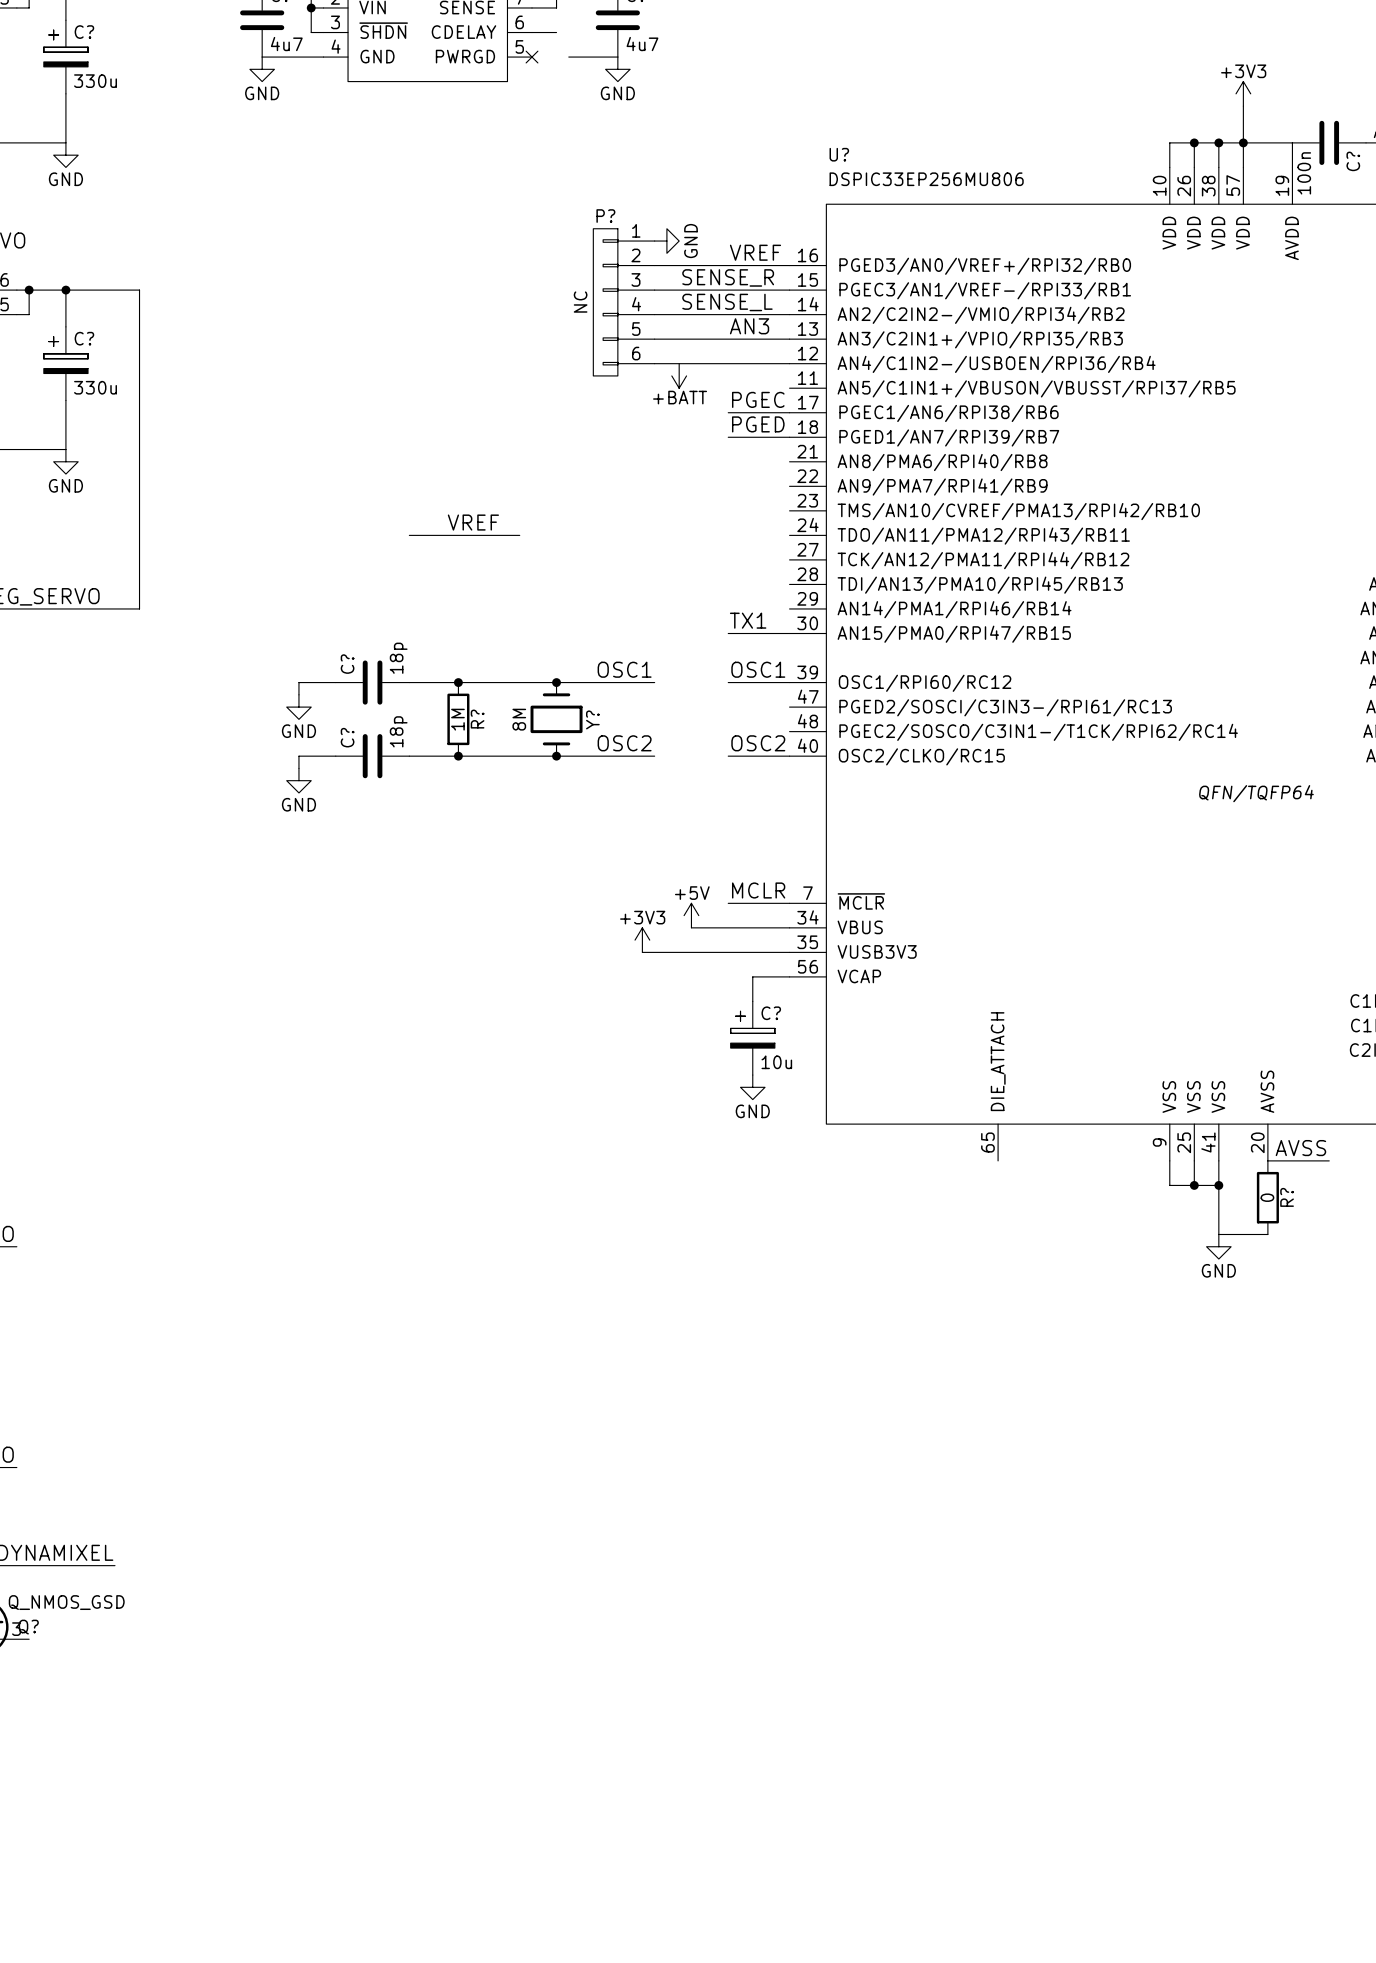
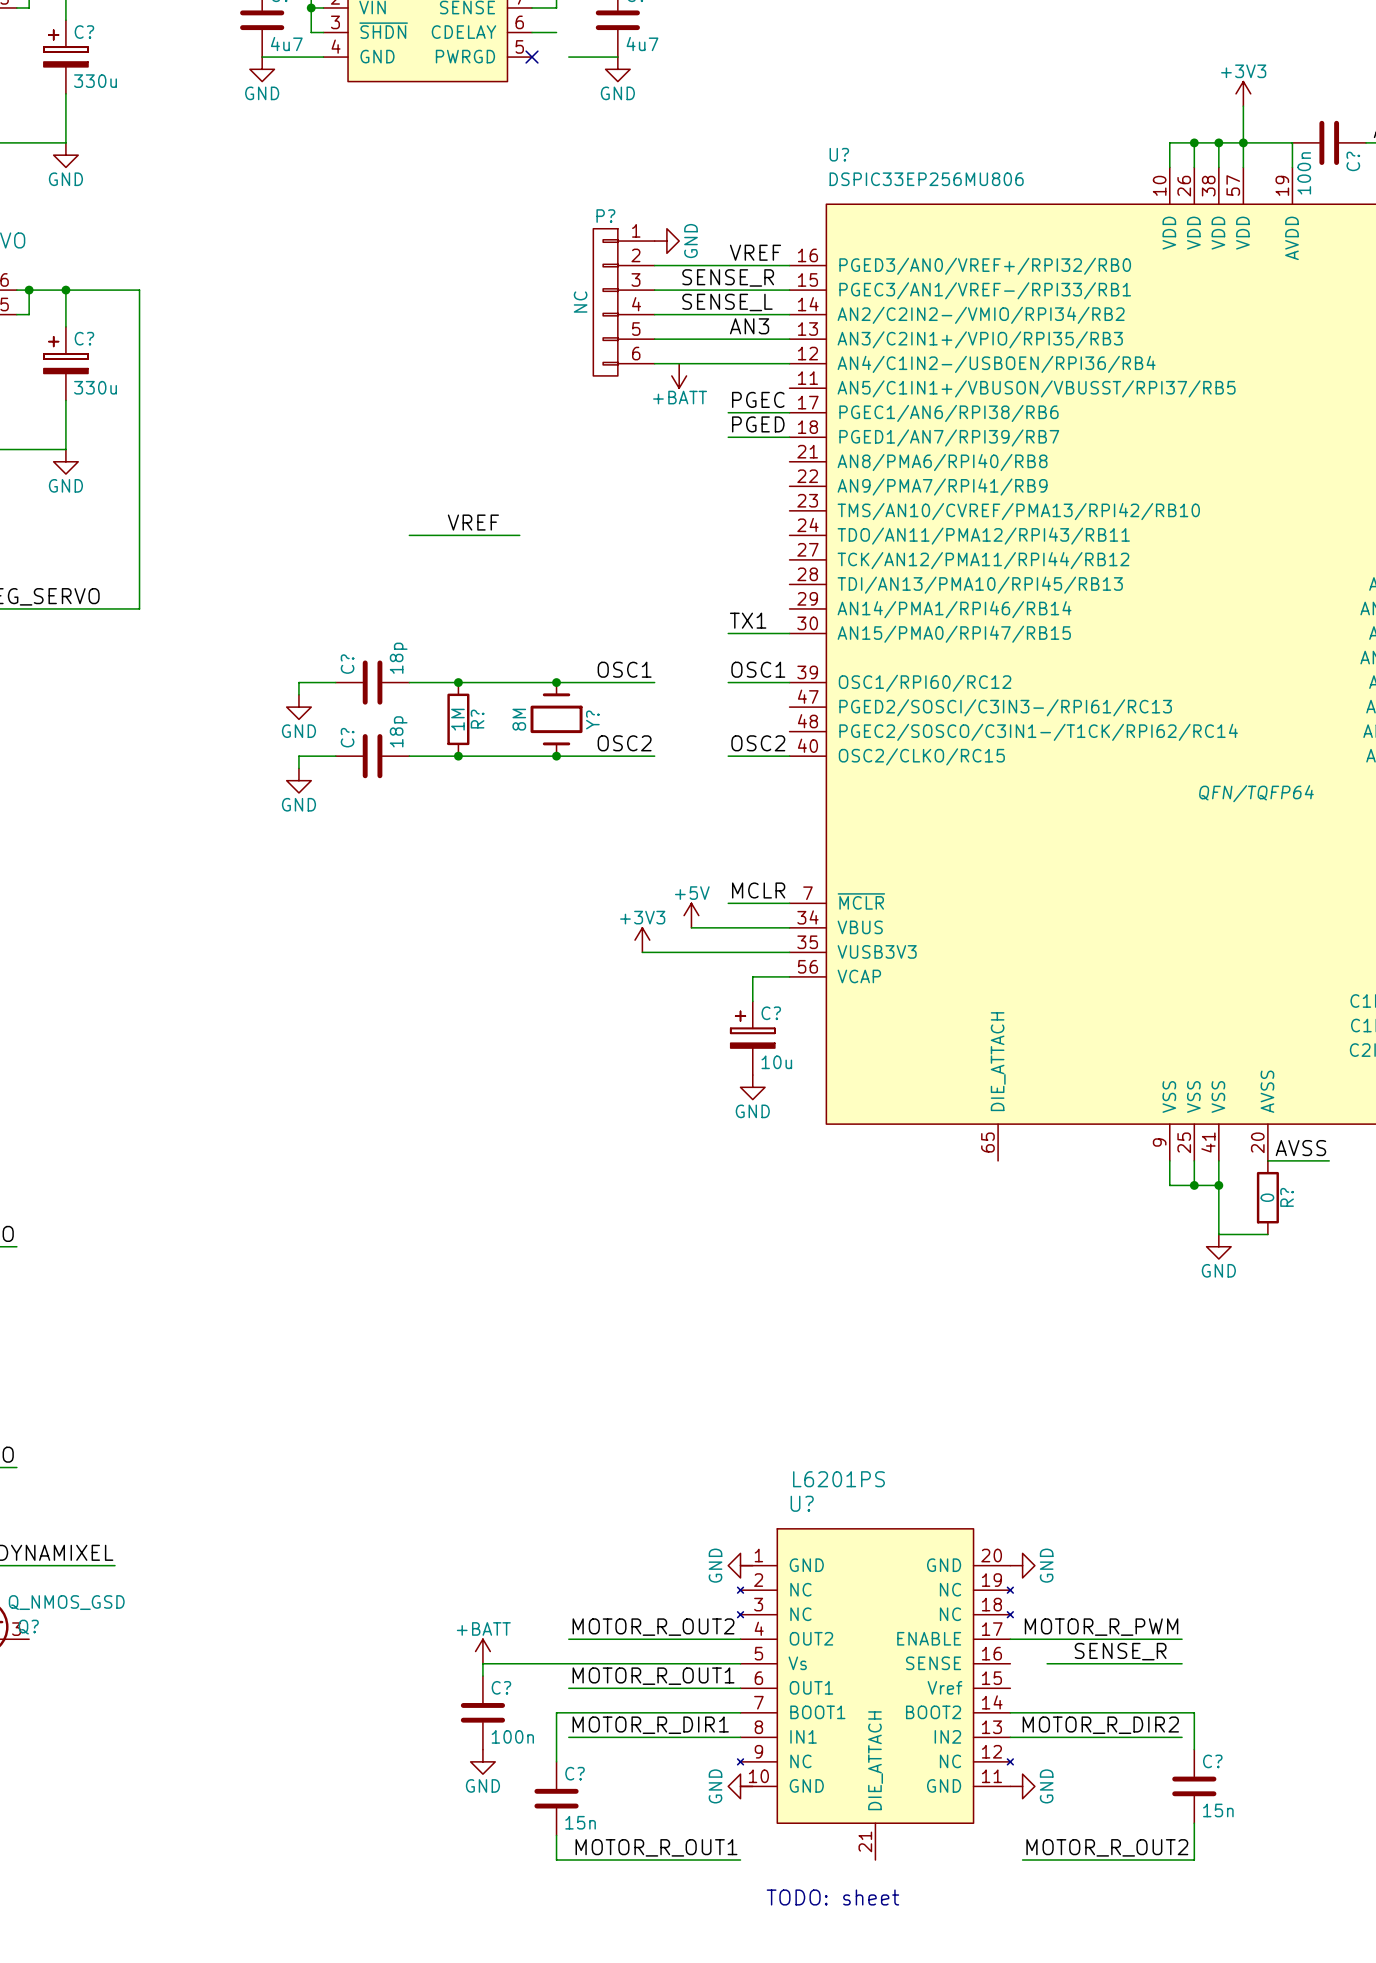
power symbol: none -> GND (740, 1565)
power symbol: none -> GND (1022, 1565)
label: none -> MOTOR_R_OUT2 (653, 1627)
label: none -> MOTOR_R_PWM (1101, 1627)
wire: none -> (568, 1639) (740, 1639)
wire: none -> (1010, 1639) (1182, 1639)
power symbol: none -> +BATT (482, 1651)
label: none -> SENSE_R (1120, 1651)
wire: none -> (740, 1663) (482, 1663) (482, 1676)
wire: none -> (1047, 1663) (1182, 1663)
label: none -> MOTOR_R_OUT1 (653, 1676)
wire: none -> (568, 1688) (740, 1688)
U?: none -> L6201PS (875, 1694)
C?: none -> 100n (482, 1712)
wire: none -> (740, 1712) (556, 1712) (556, 1761)
wire: none -> (1010, 1712) (1194, 1712) (1194, 1749)
label: none -> MOTOR_R_DIR1 (650, 1725)
label: none -> MOTOR_R_DIR2 (1100, 1725)
wire: none -> (568, 1737) (740, 1737)
wire: none -> (1010, 1737) (1182, 1737)
power symbol: none -> GND (482, 1761)
power symbol: none -> GND (740, 1786)
power symbol: none -> GND (1022, 1786)
C?: none -> 15n (1194, 1786)
C?: none -> 15n (556, 1798)
wire: none -> (1194, 1823) (1194, 1860) (1022, 1860)
wire: none -> (556, 1835) (556, 1860) (740, 1860)
label: none -> MOTOR_R_OUT1 (656, 1847)
label: none -> MOTOR_R_OUT2 (1107, 1847)
text: none -> TODO: sheet (832, 1897)

